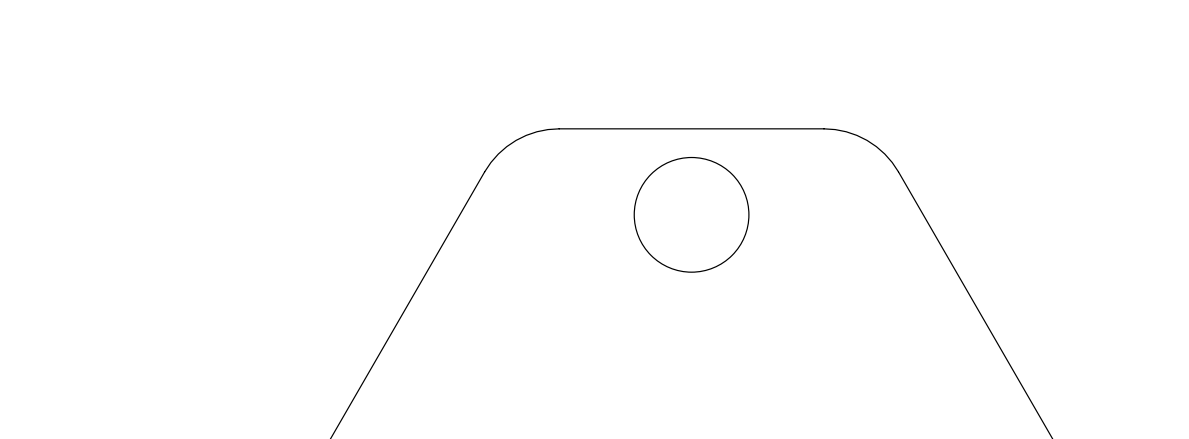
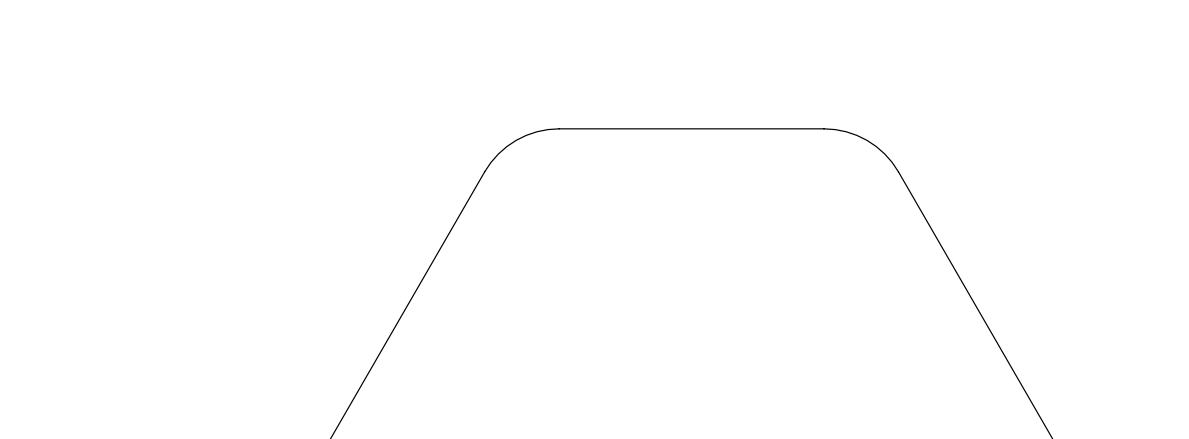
round board edge: [634, 157, 749, 273] -> none

